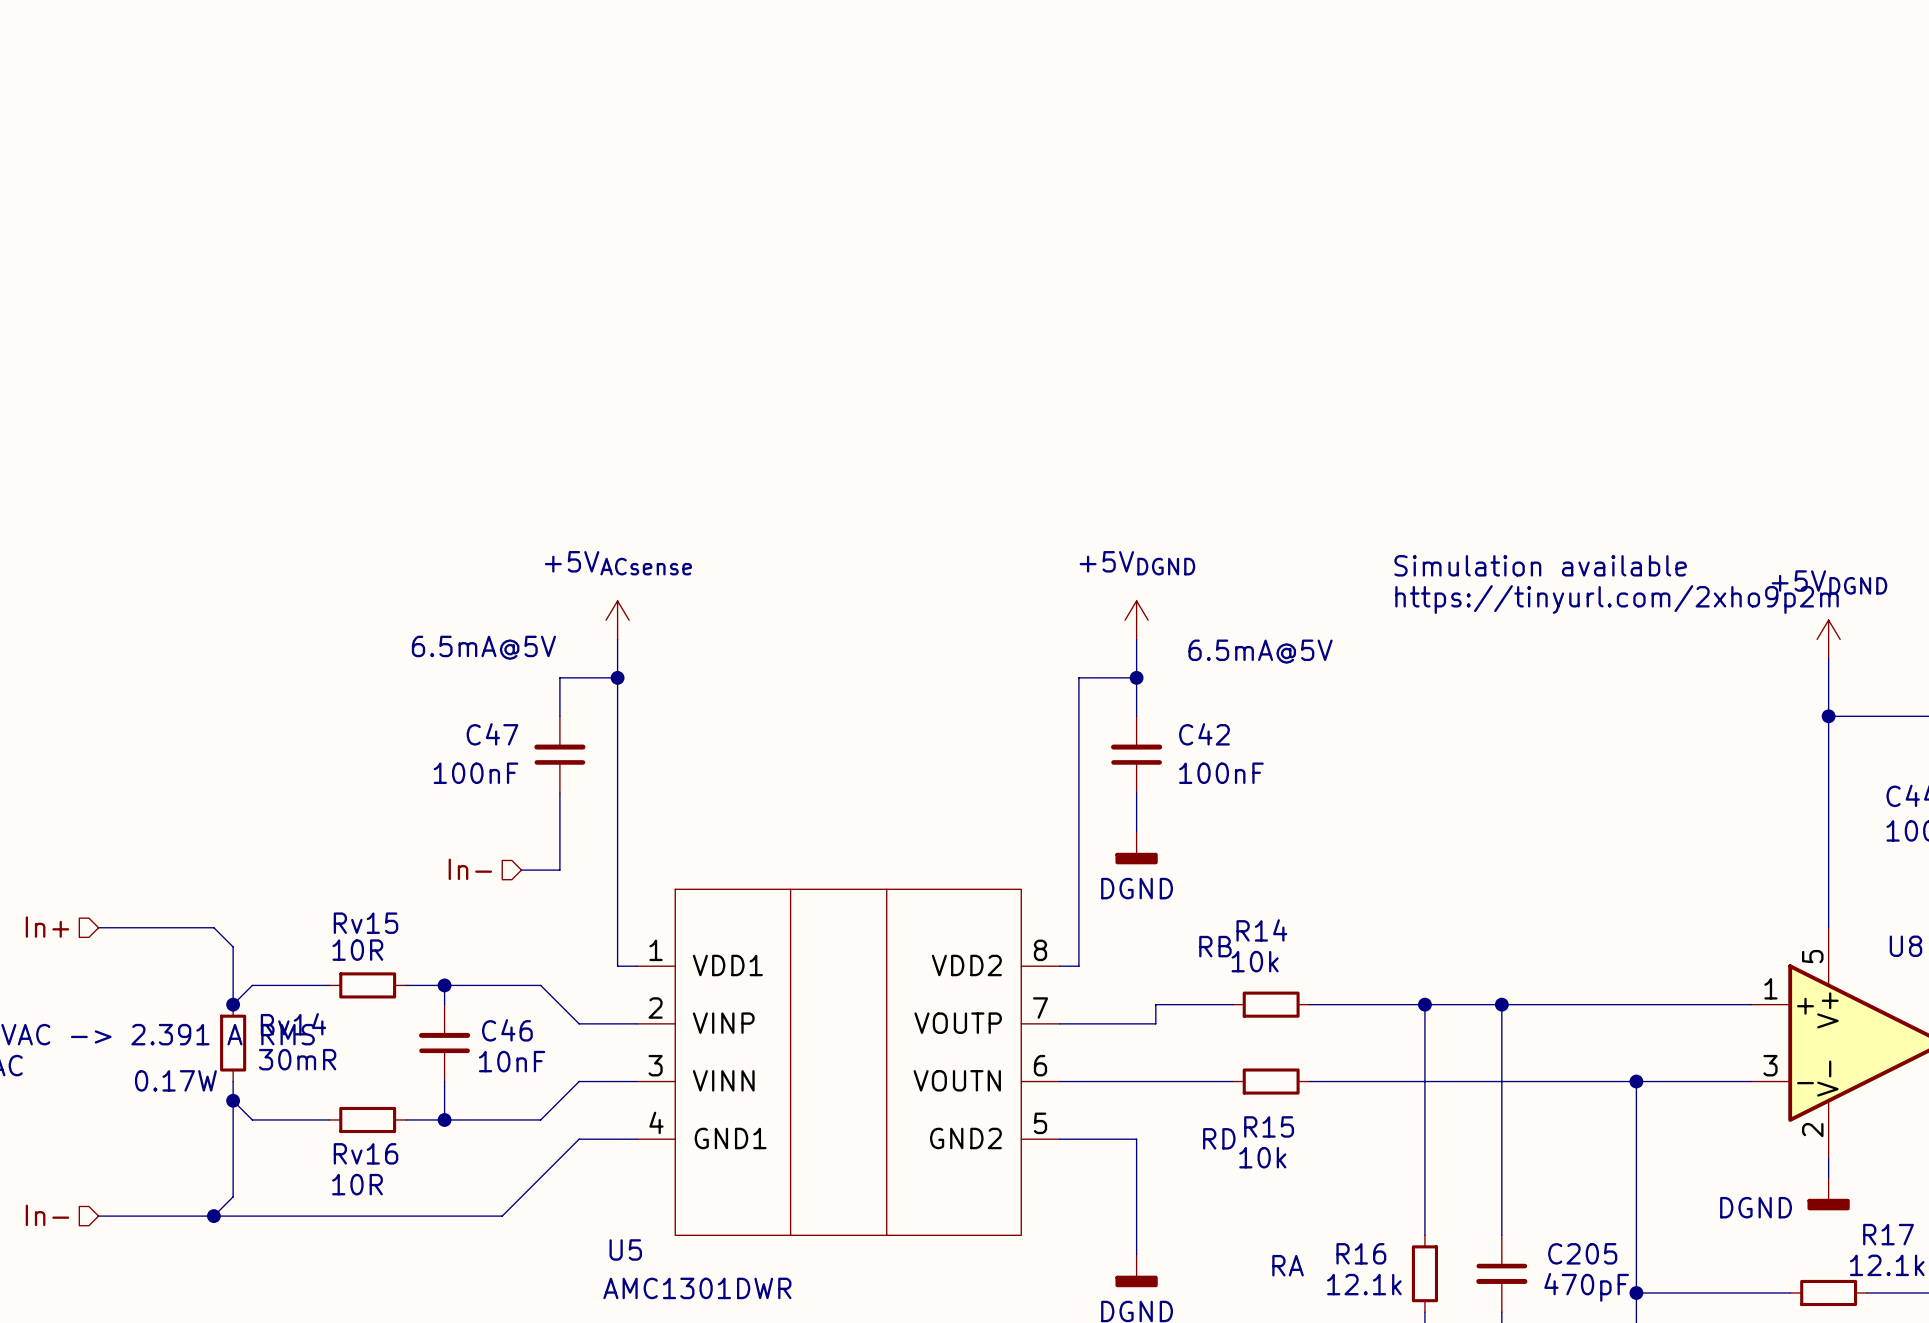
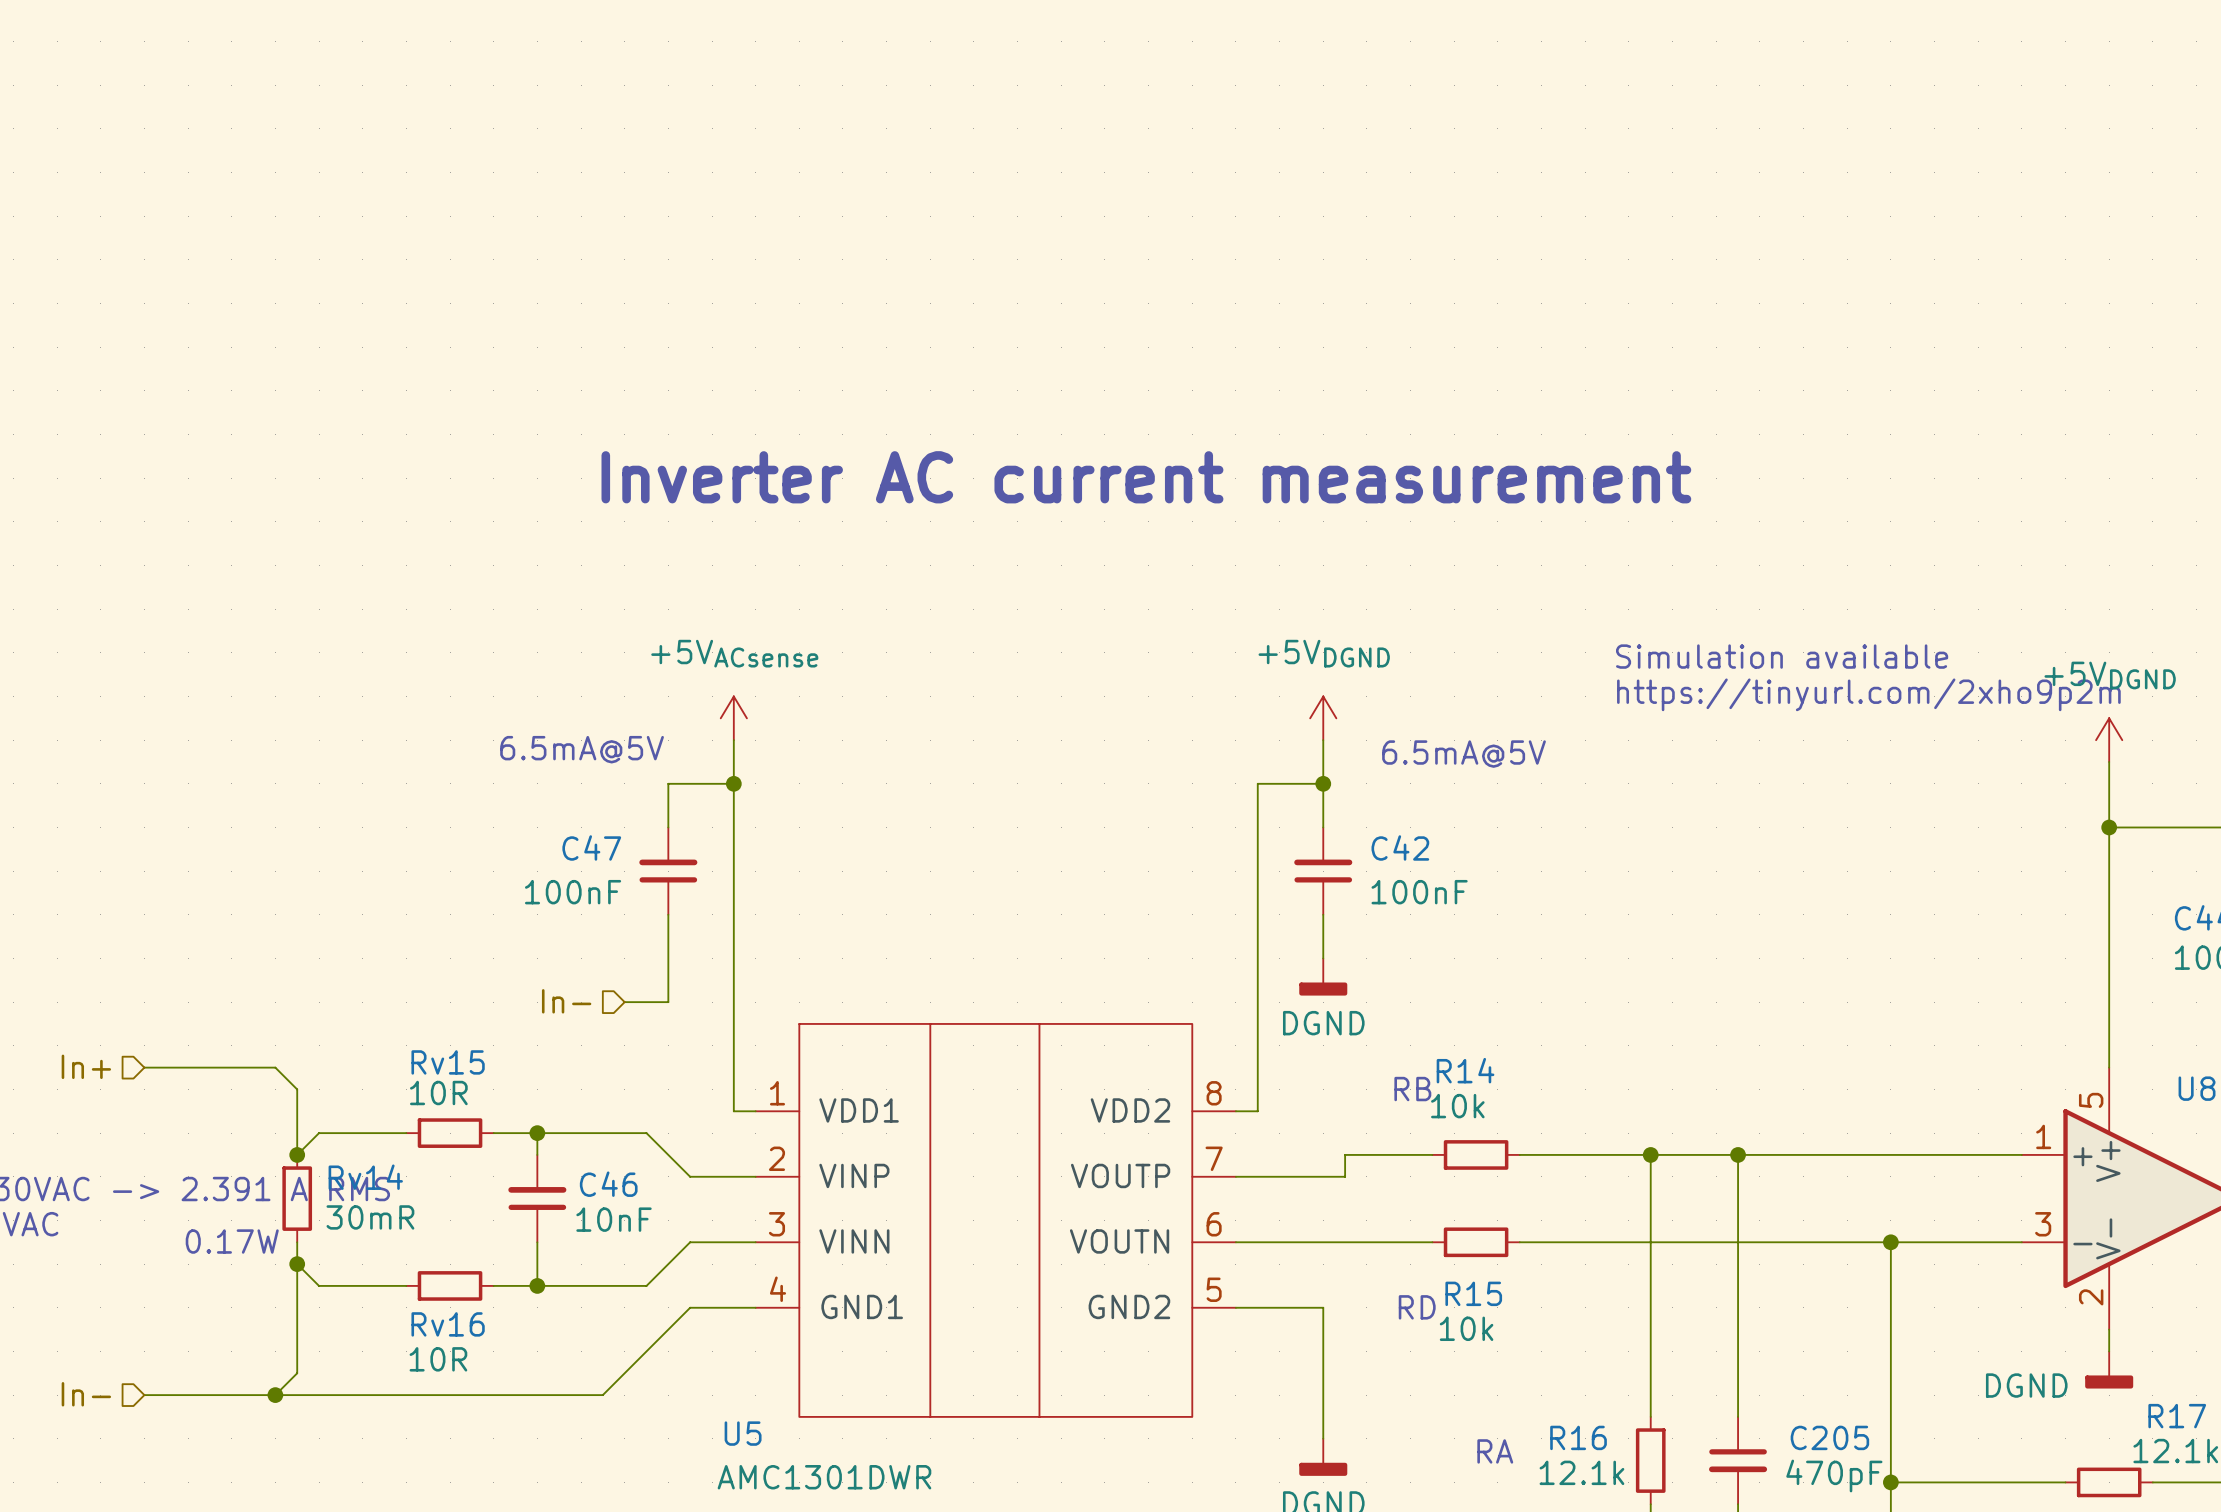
text: none -> Inverter AC current measurement (1146, 477)

